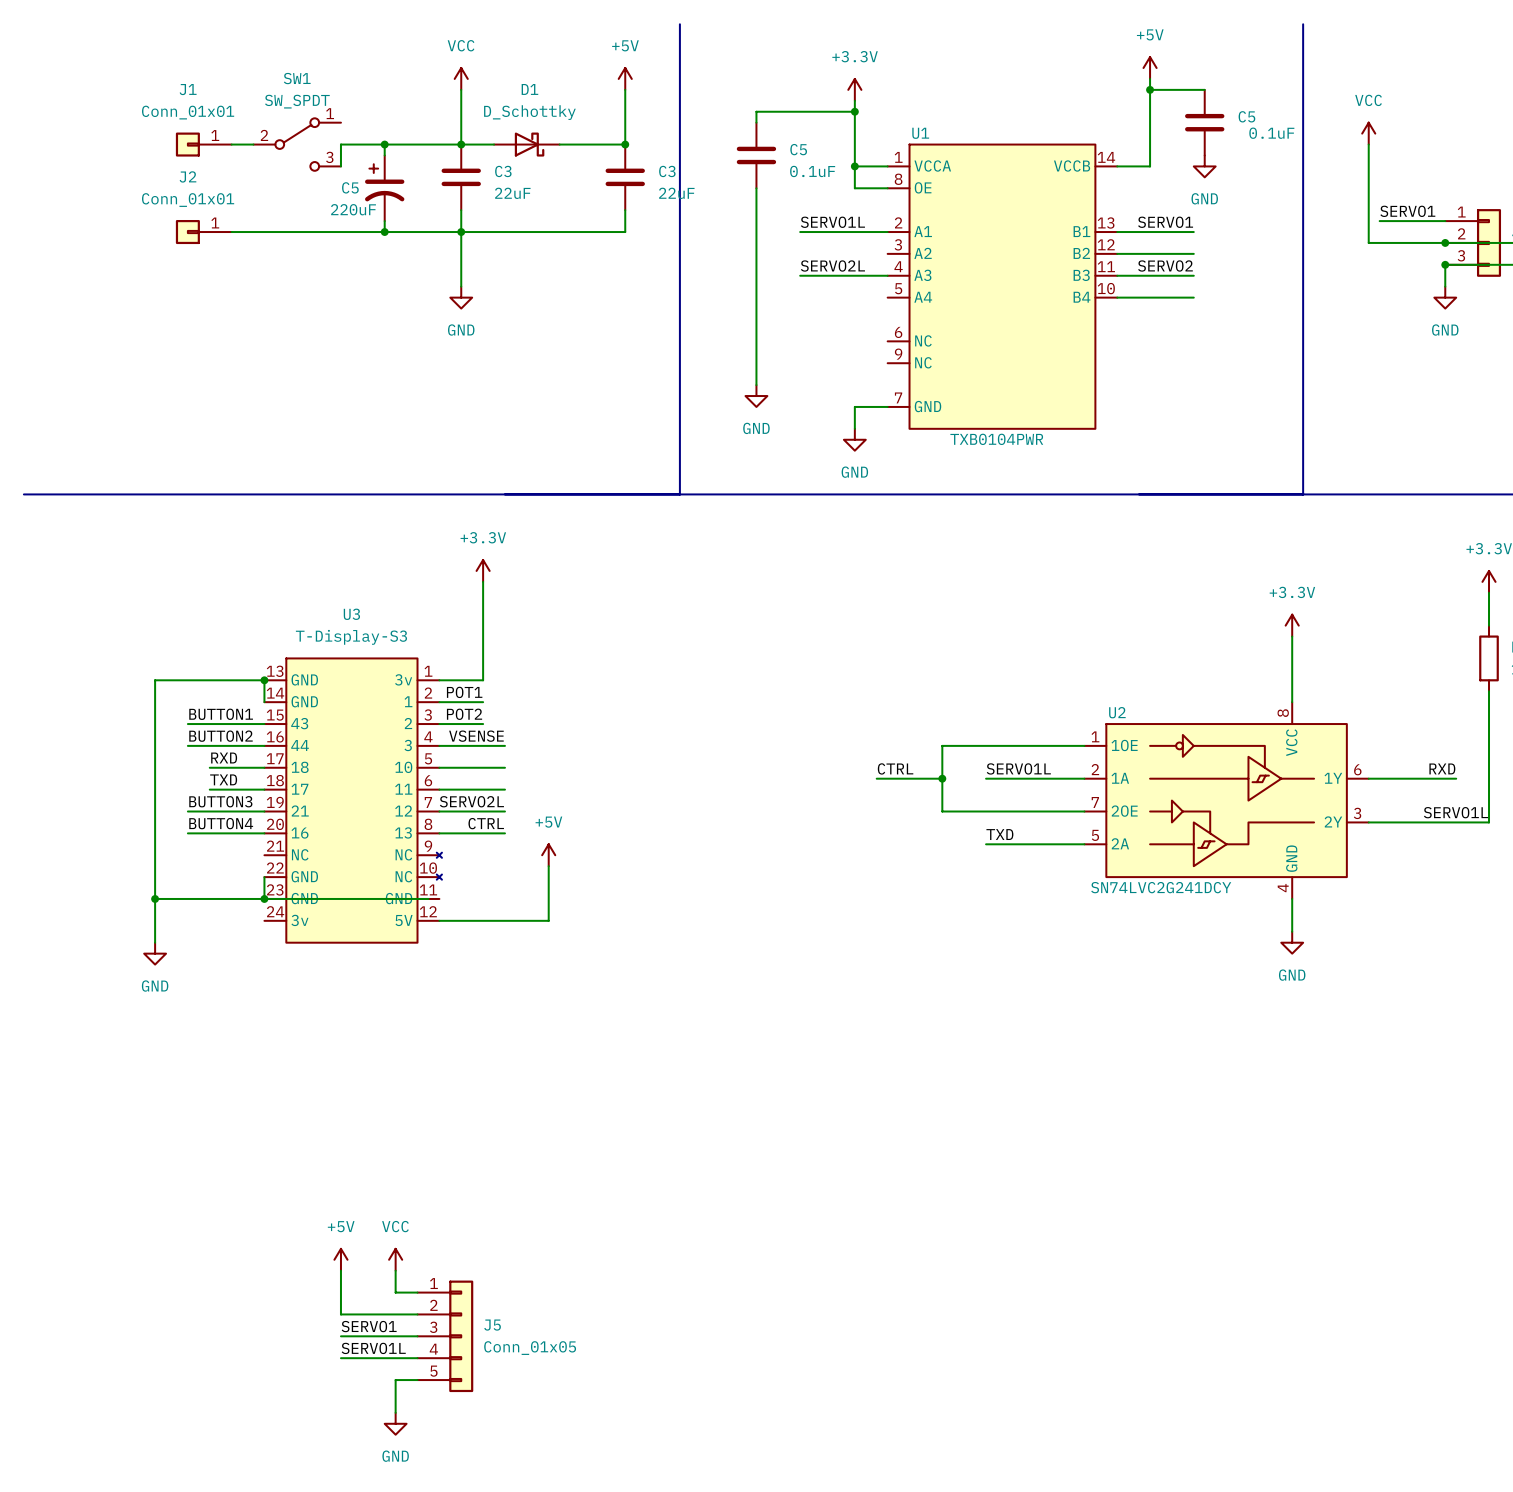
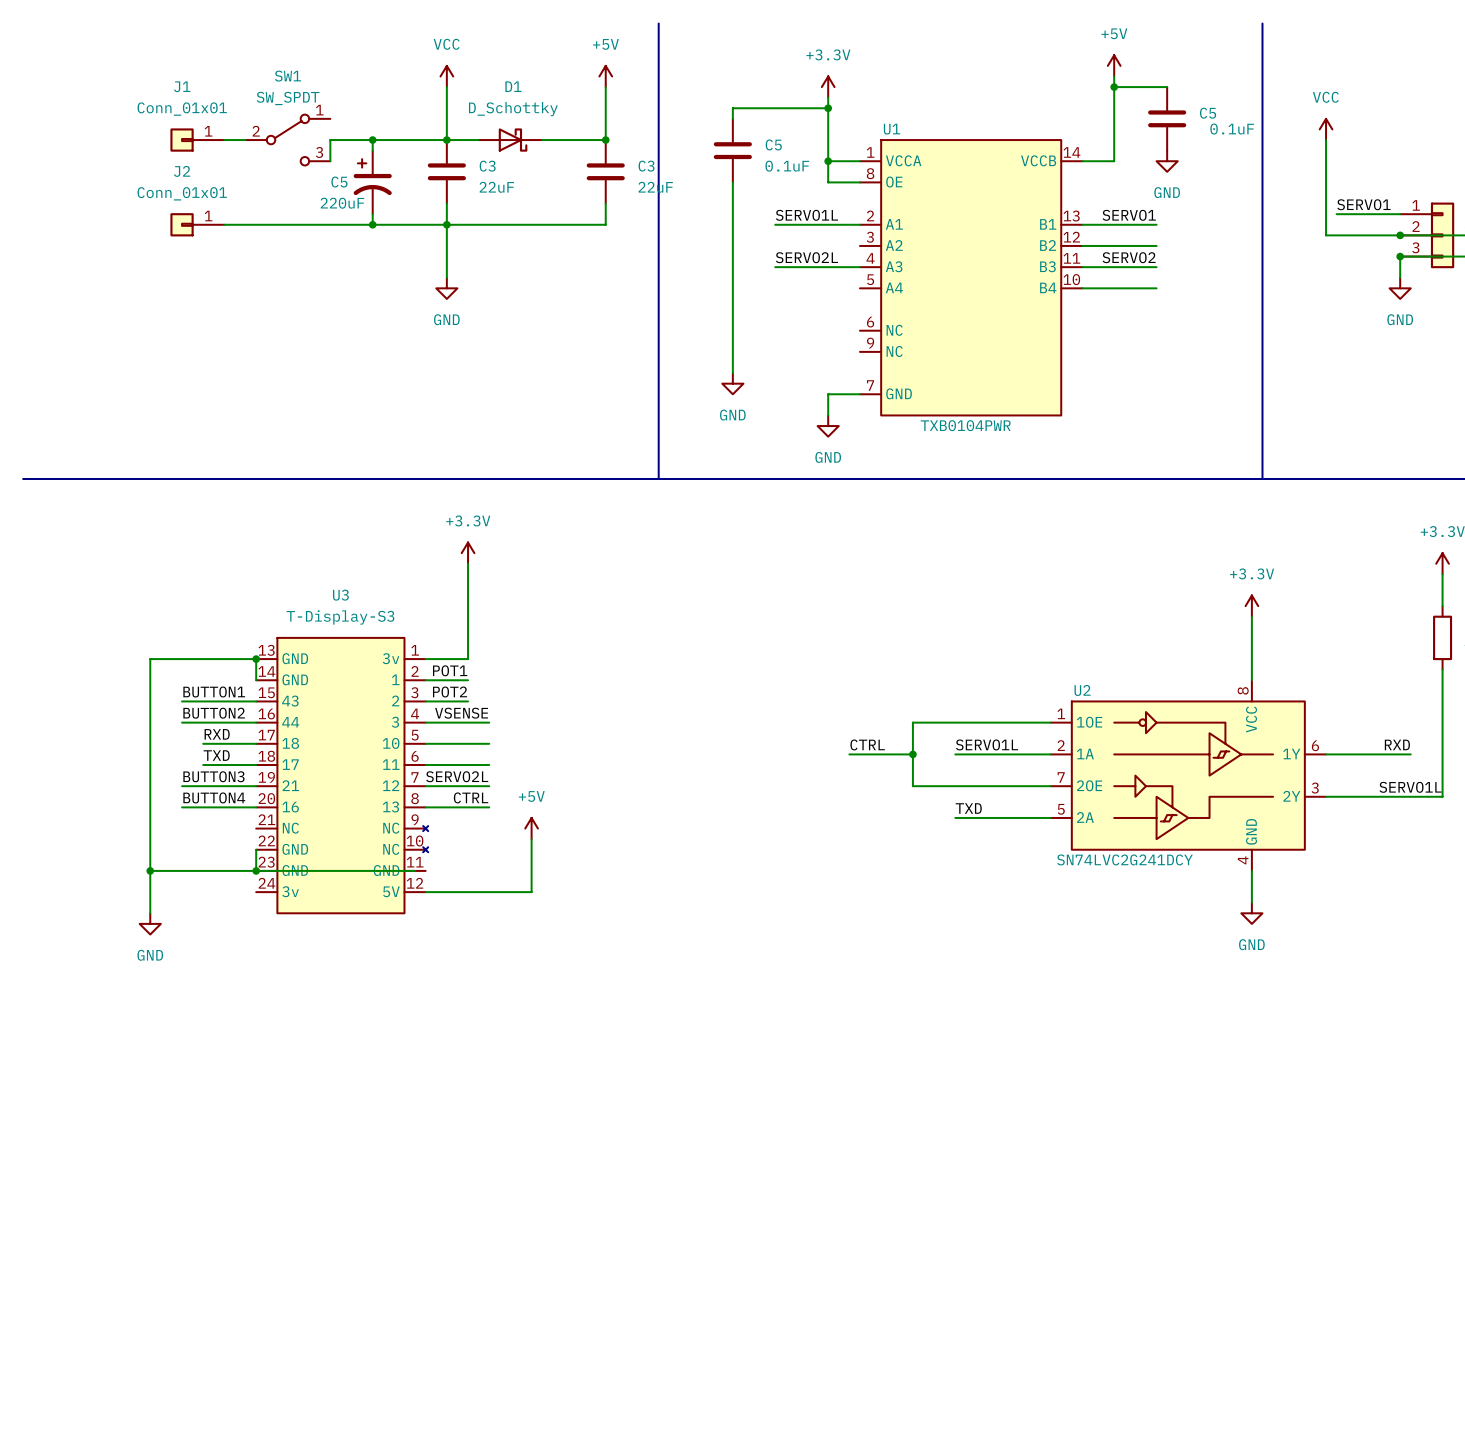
power symbol: +5V (340, 1259) -> none
power symbol: VCC (395, 1259) -> none
wire: (340, 1270) (340, 1314) (417, 1314) -> none
wire: (395, 1270) (395, 1292) (417, 1292) -> none
label: SERVO1 (369, 1326) -> none
wire: (340, 1336) (417, 1336) -> none
J5: Conn_01x05 (445, 1336) -> none
label: SERVO1L (373, 1348) -> none
wire: (340, 1358) (417, 1358) -> none
wire: (417, 1380) (395, 1380) (395, 1412) -> none
power symbol: GND (395, 1423) -> none

